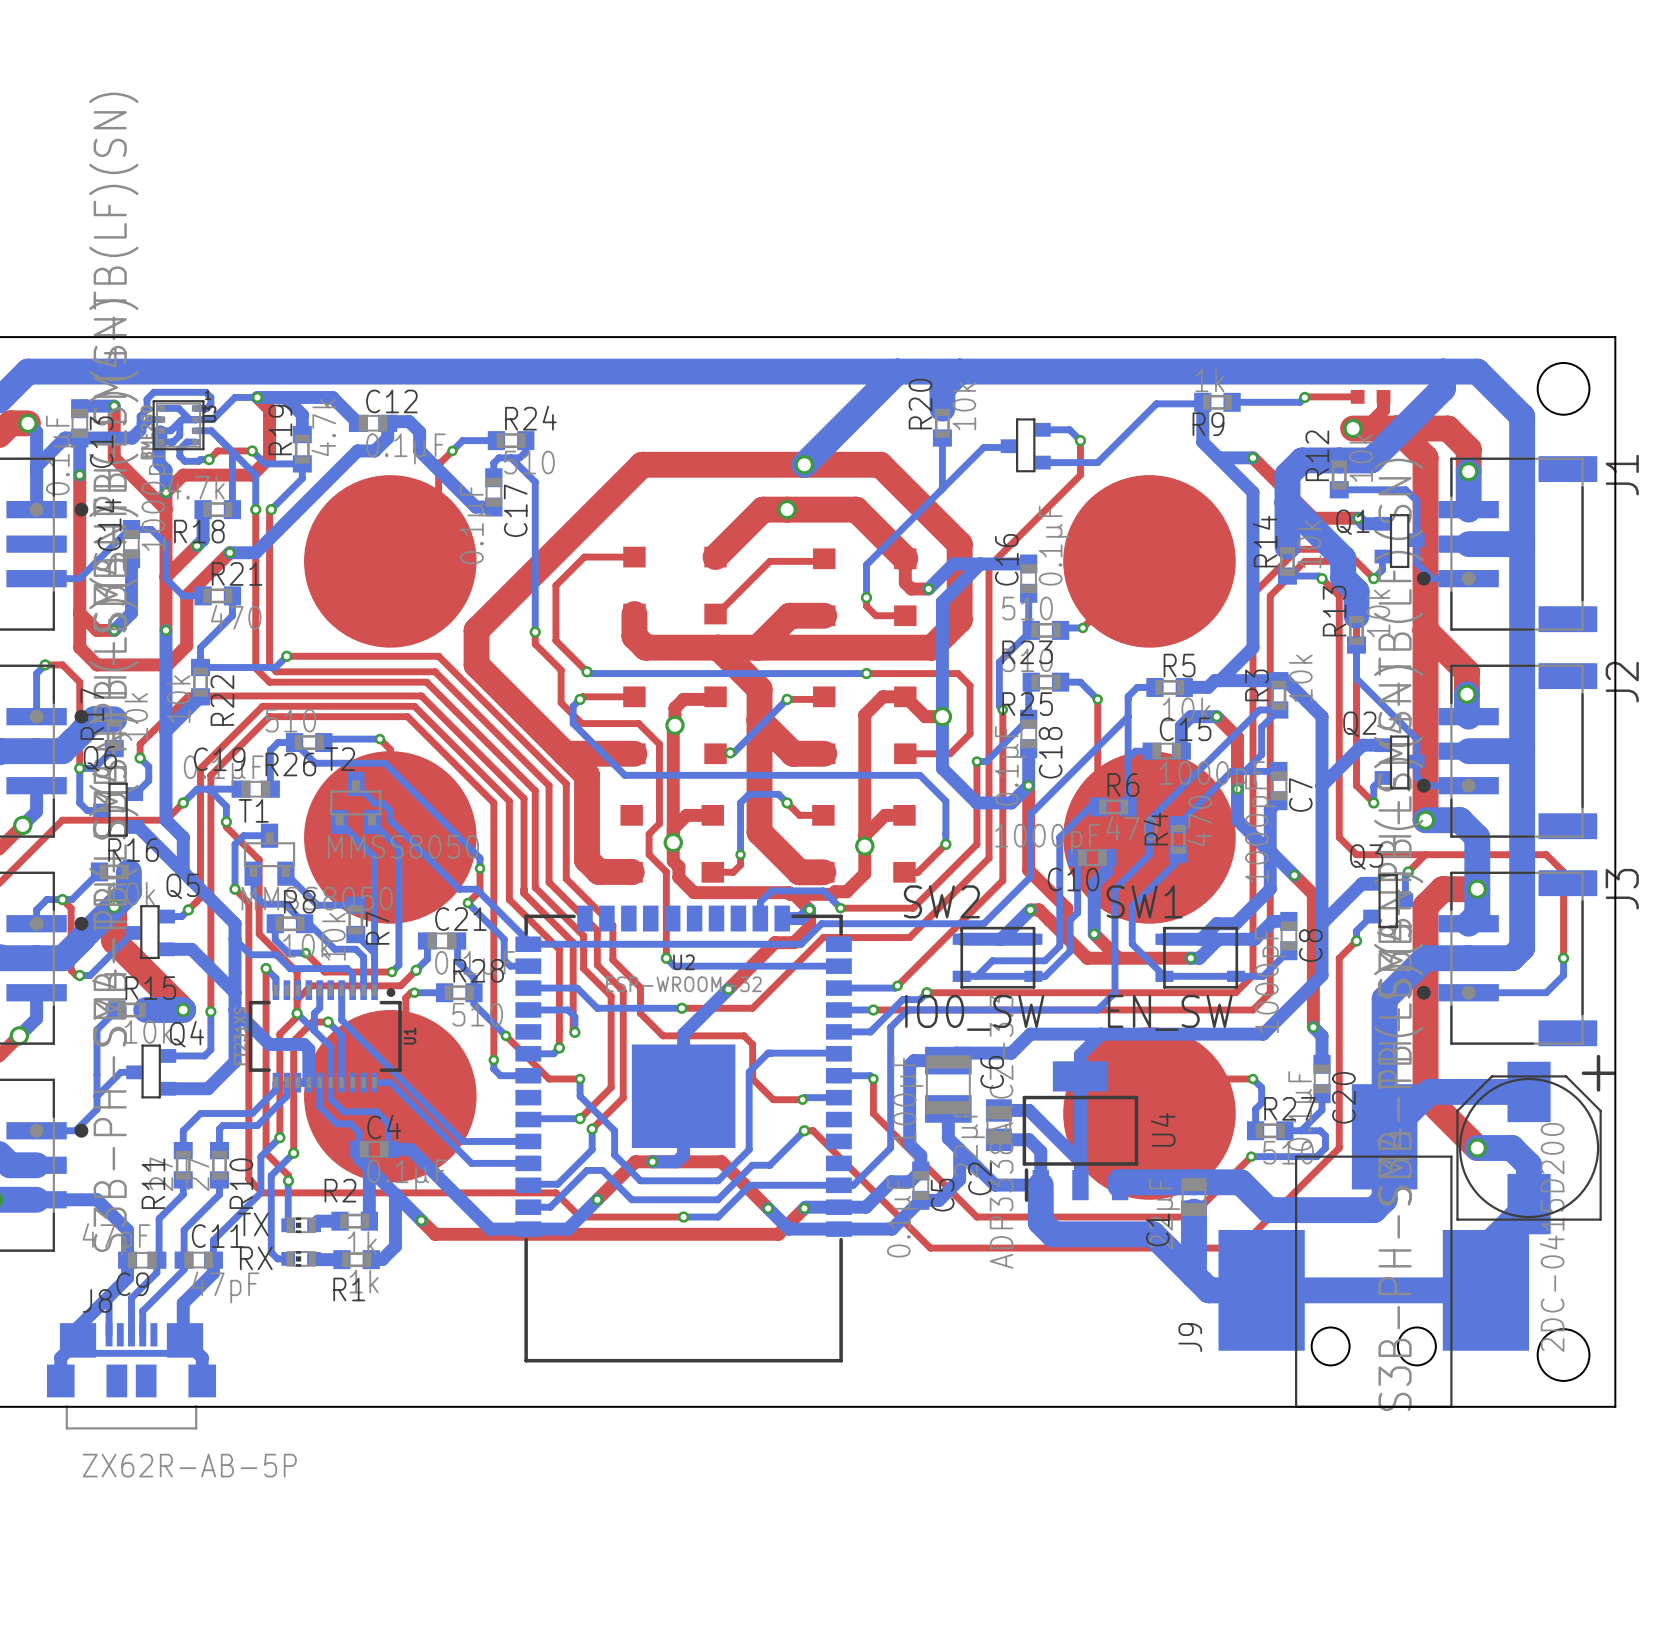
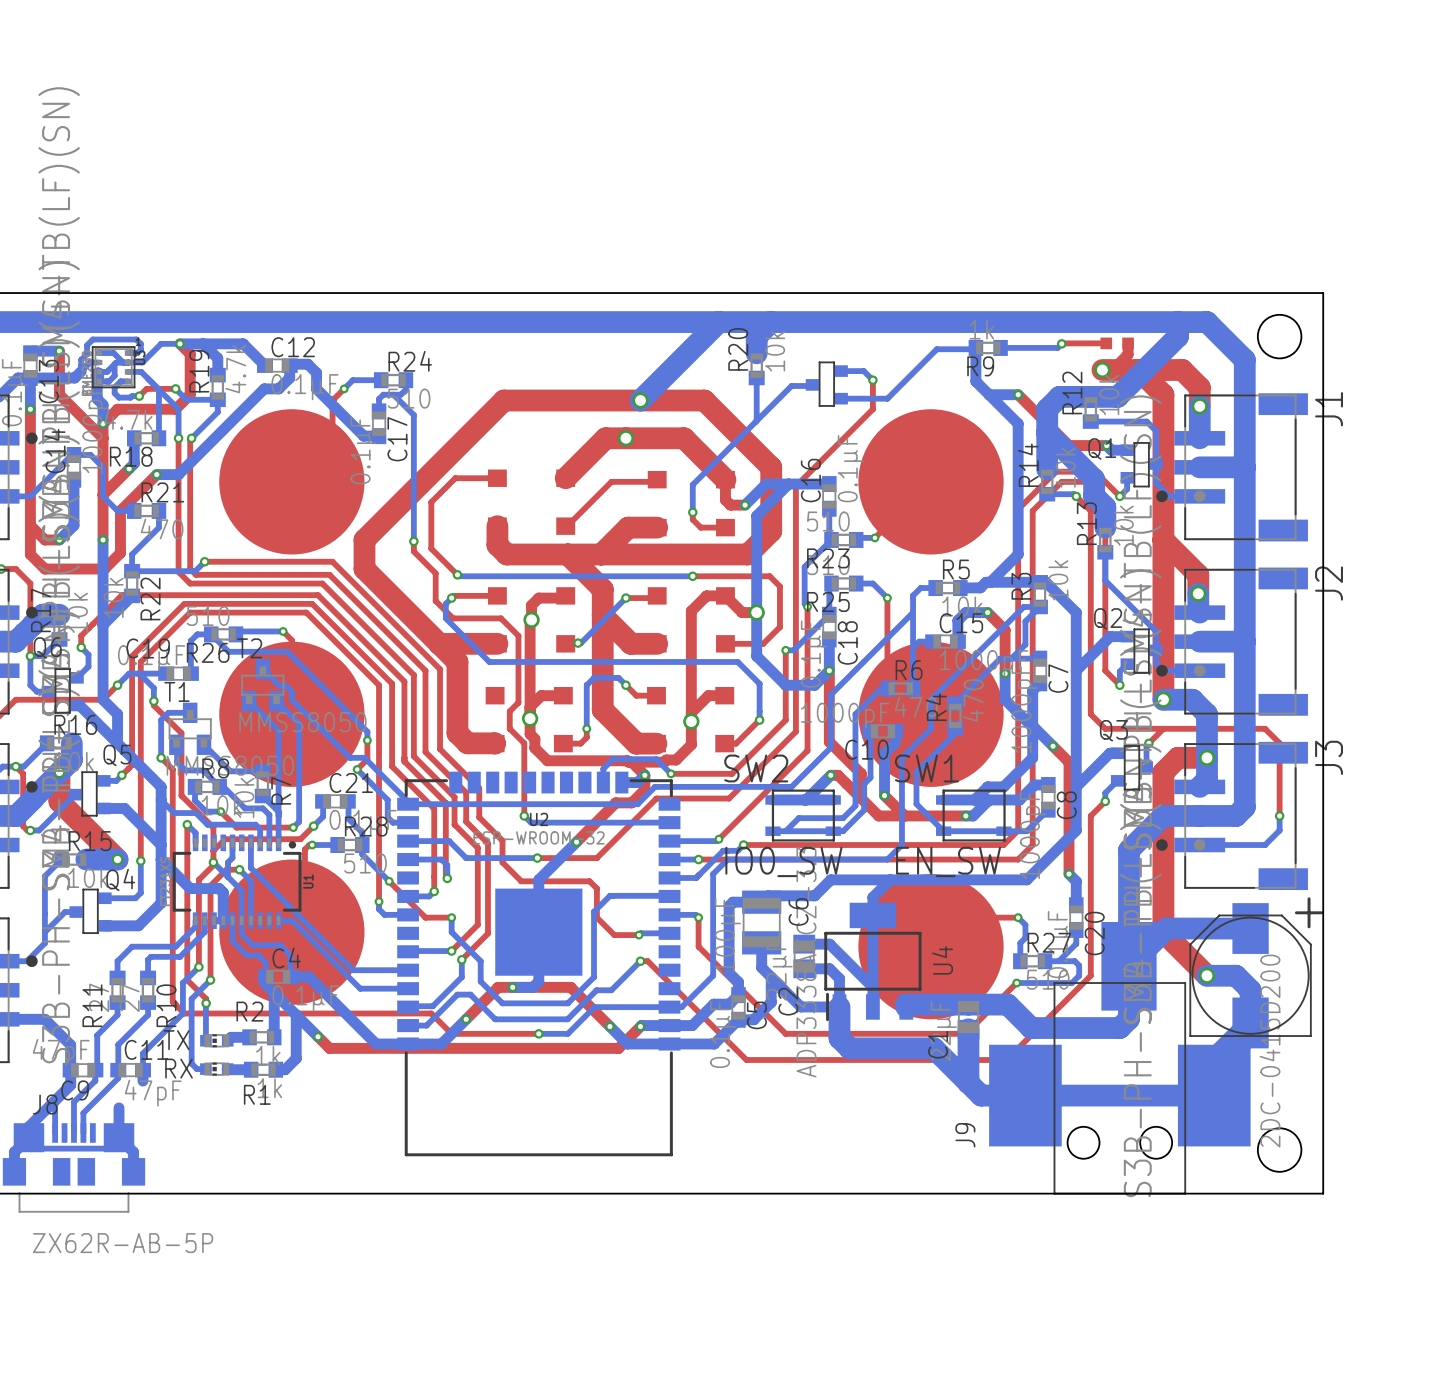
bottom track: (213, 1273) (183, 1303) (183, 1338) (184, 1339) -> (119, 1107) (119, 1137)

